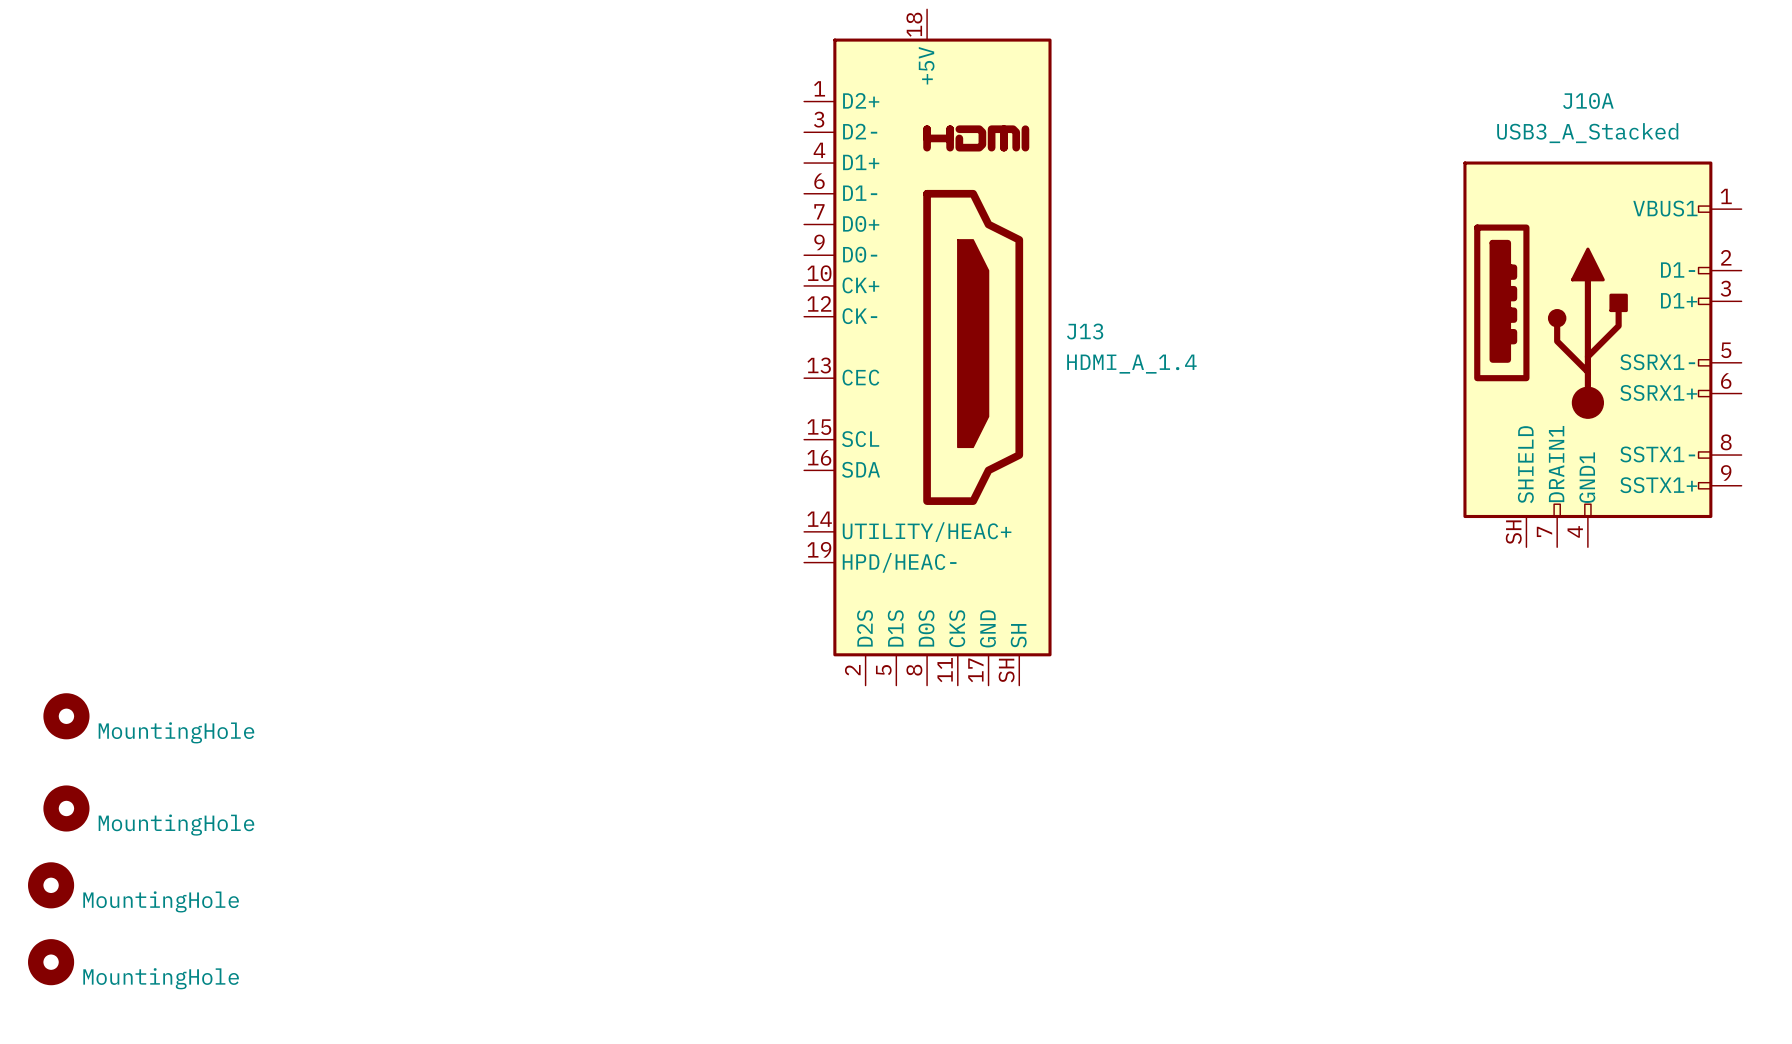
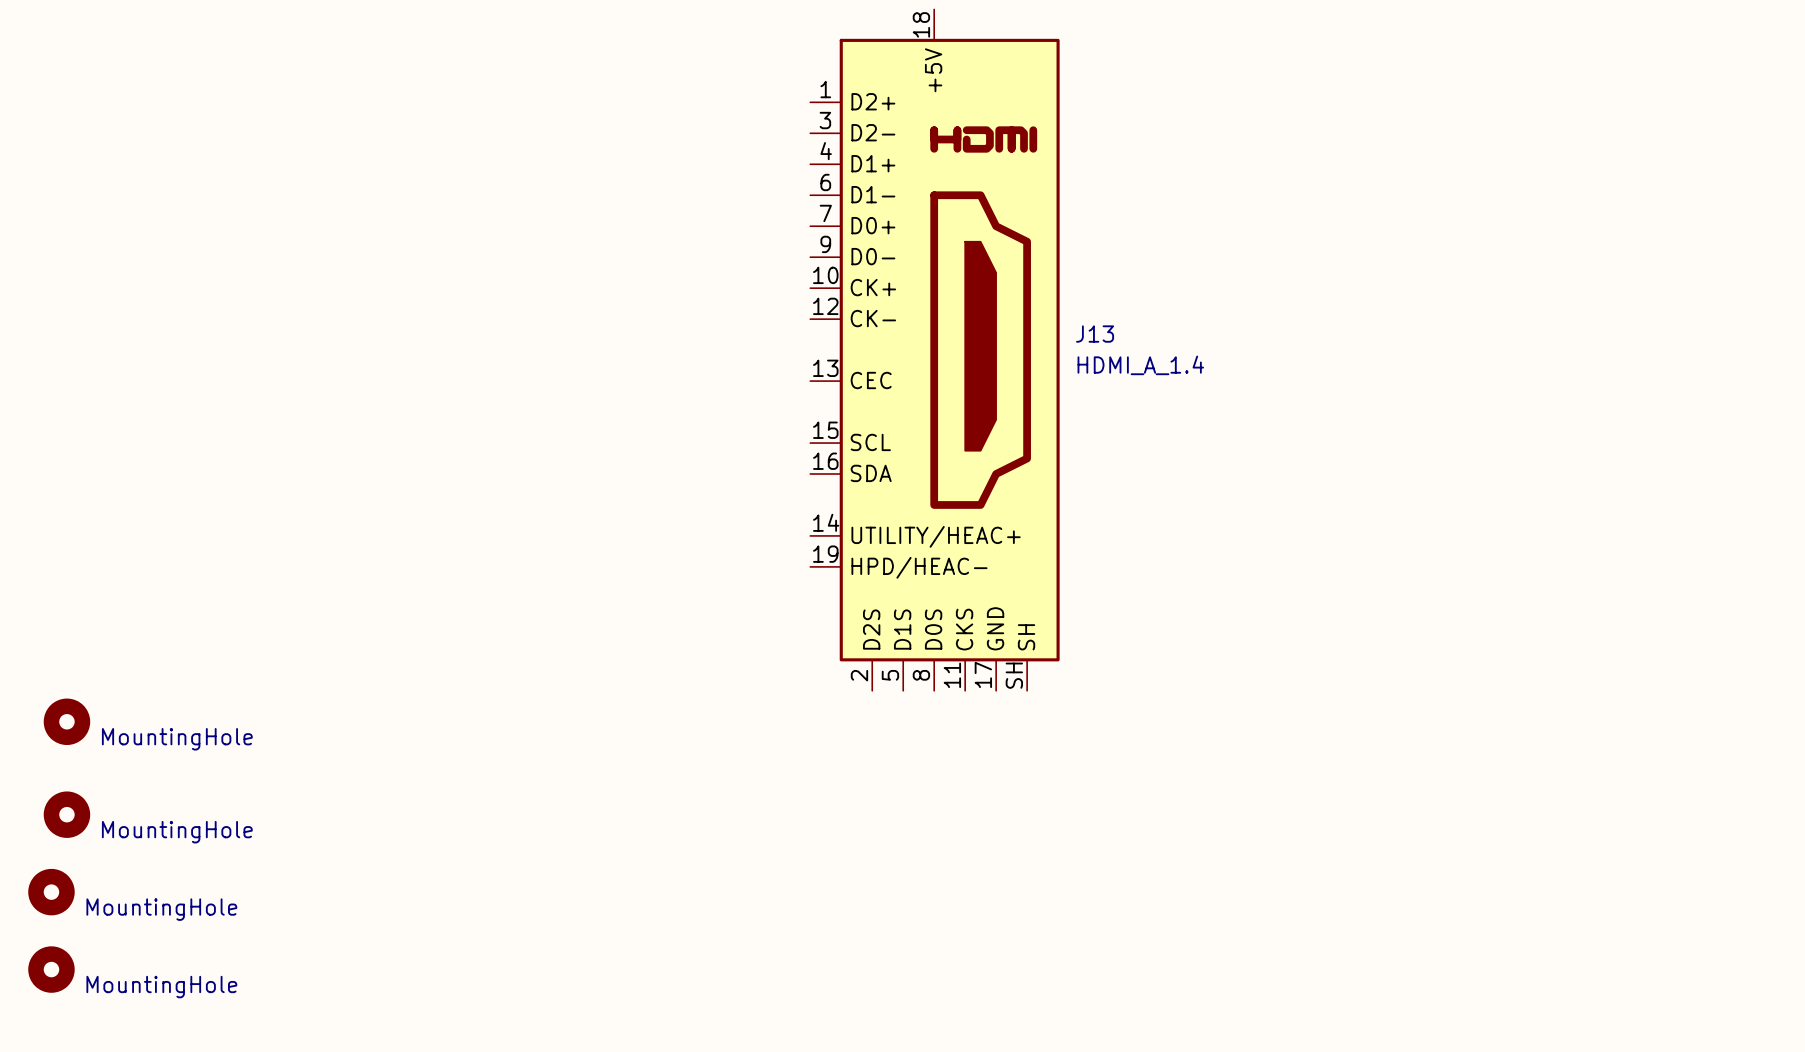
J10A: USB3_A_Stacked (1602, 354) -> none

